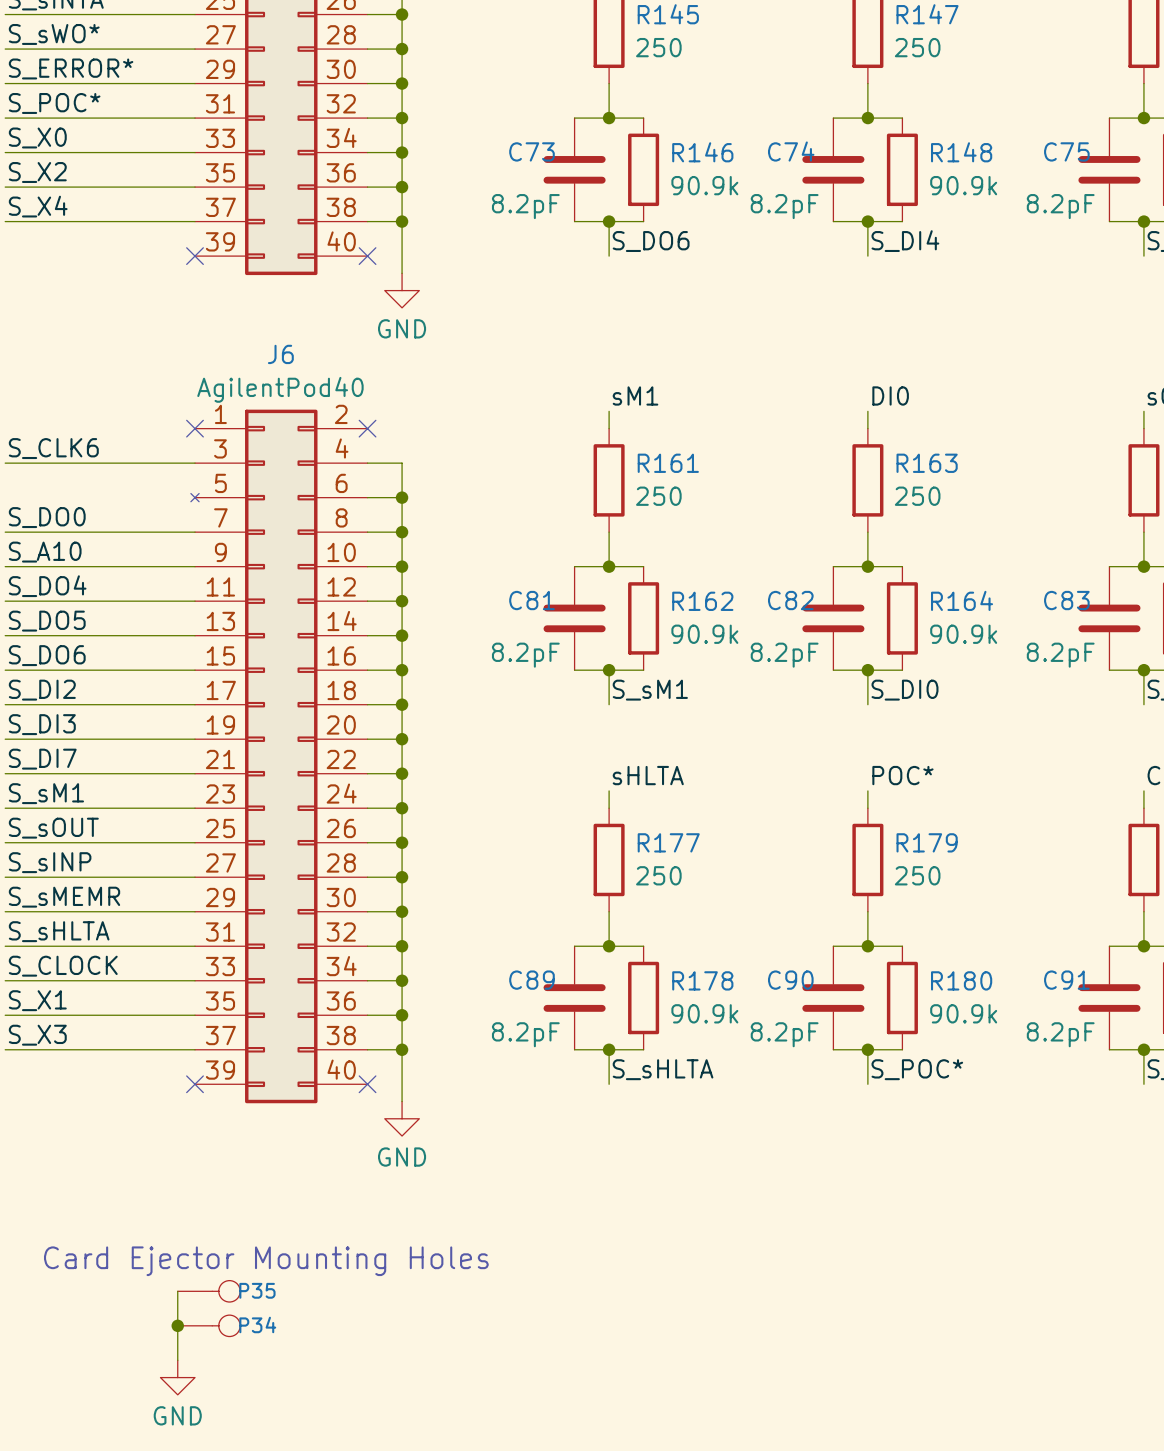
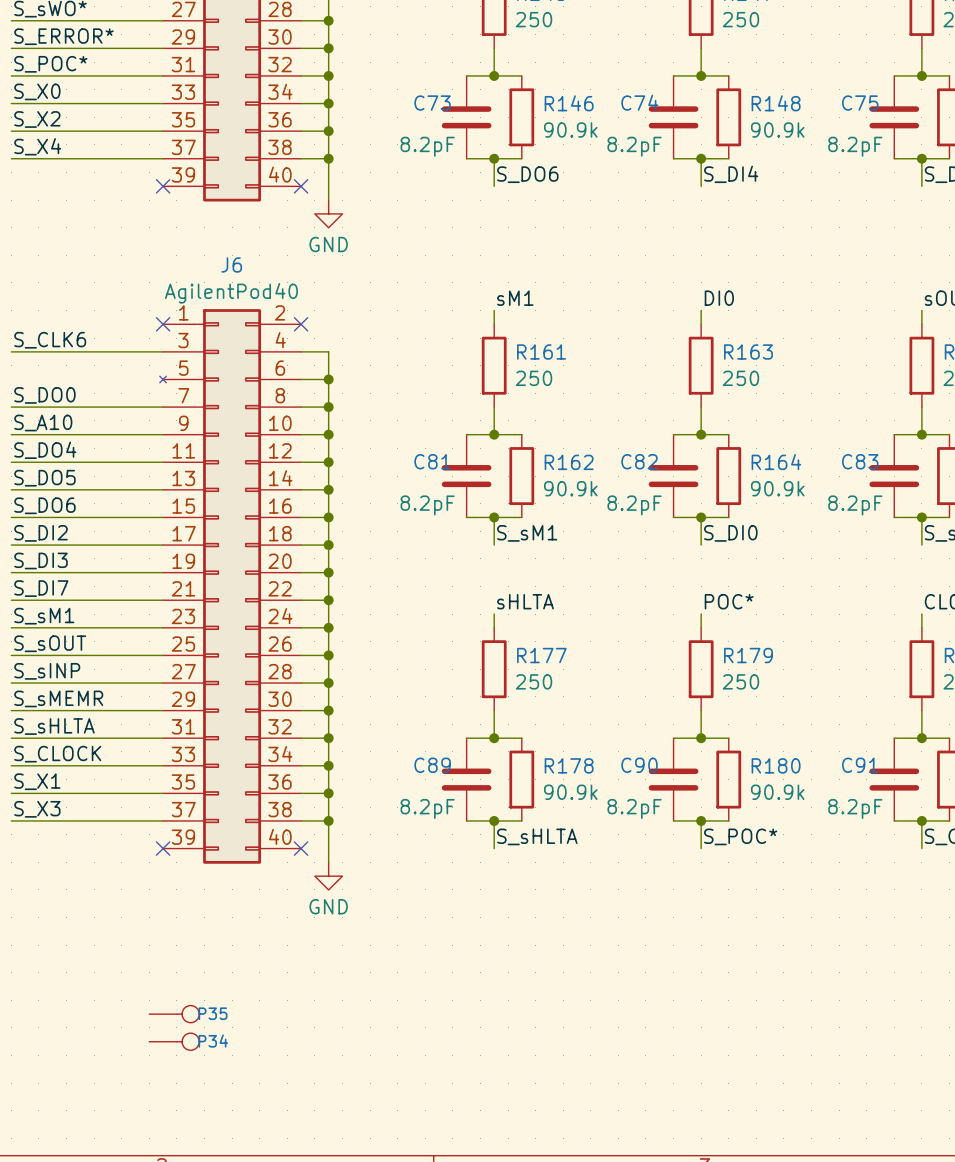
text: Card Ejector Mounting Holes (266, 1261) -> none
wire: (177, 1291) (177, 1360) -> none
junction: (177, 1325) -> none
power symbol: GND (177, 1377) -> none

